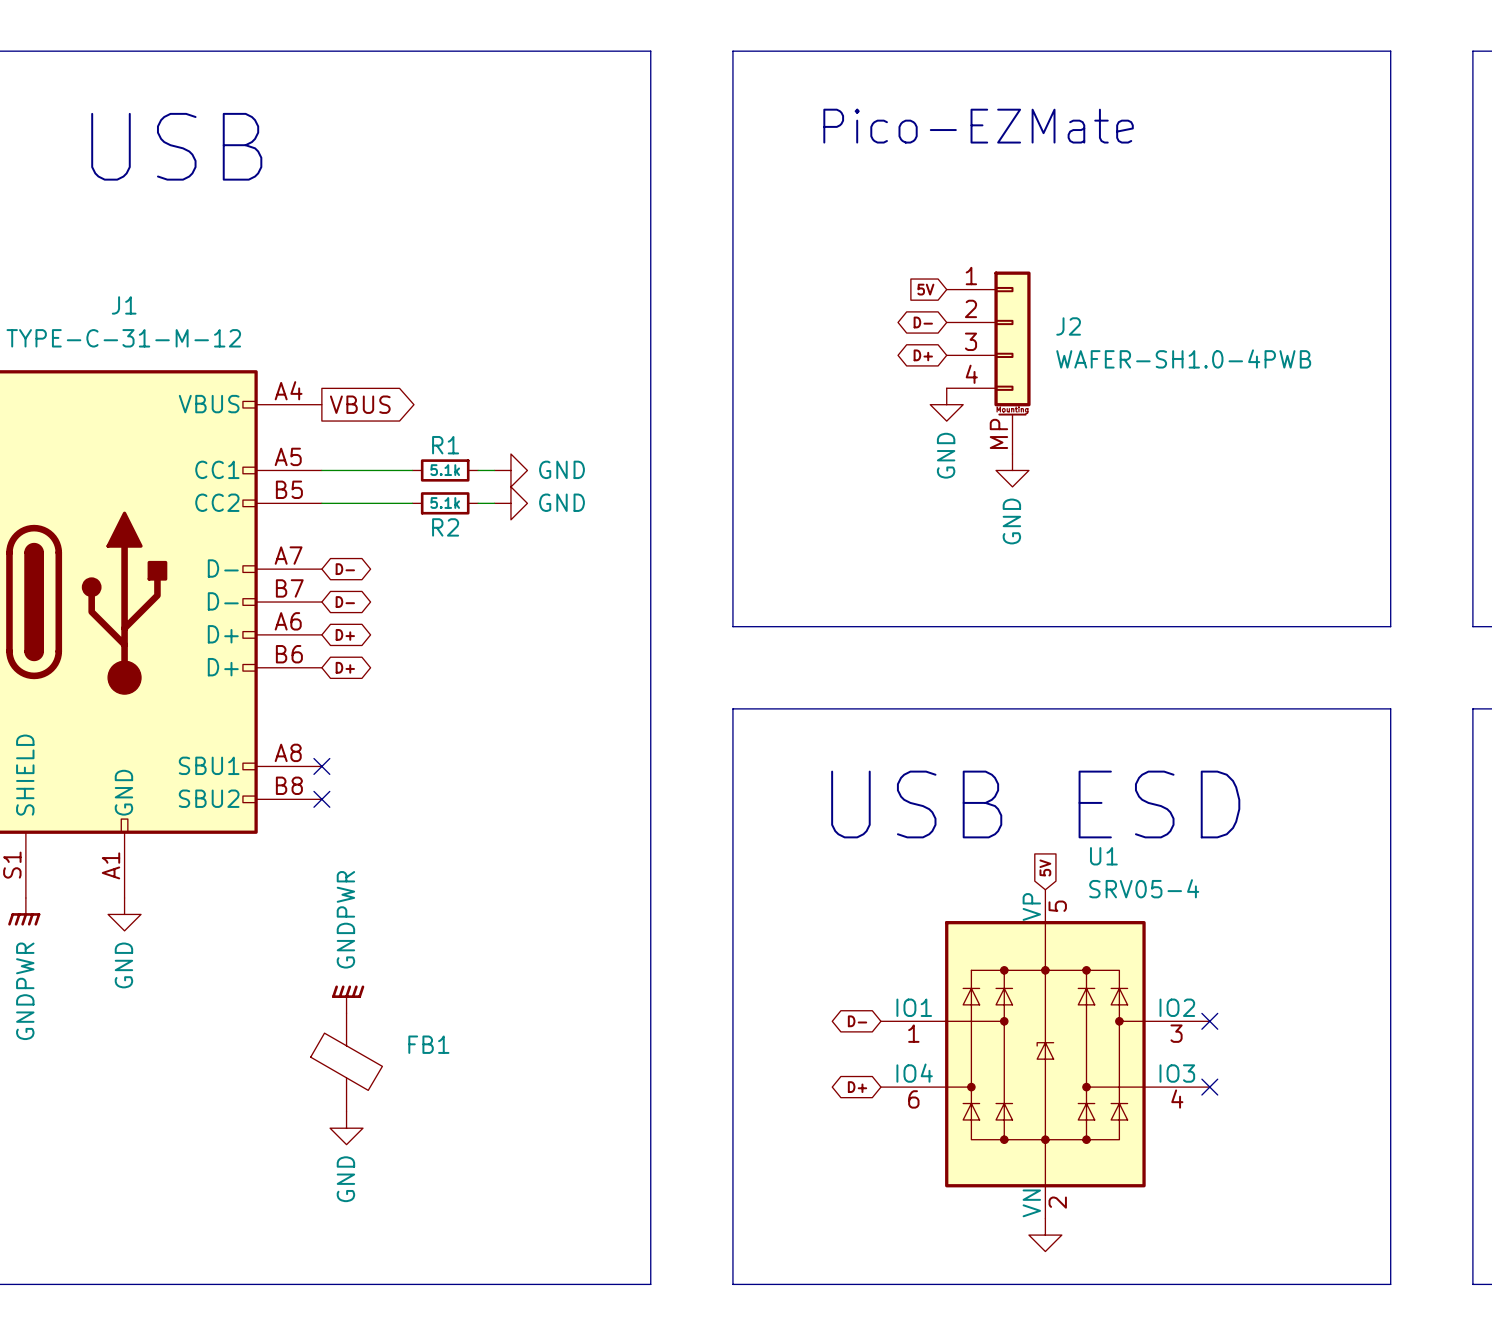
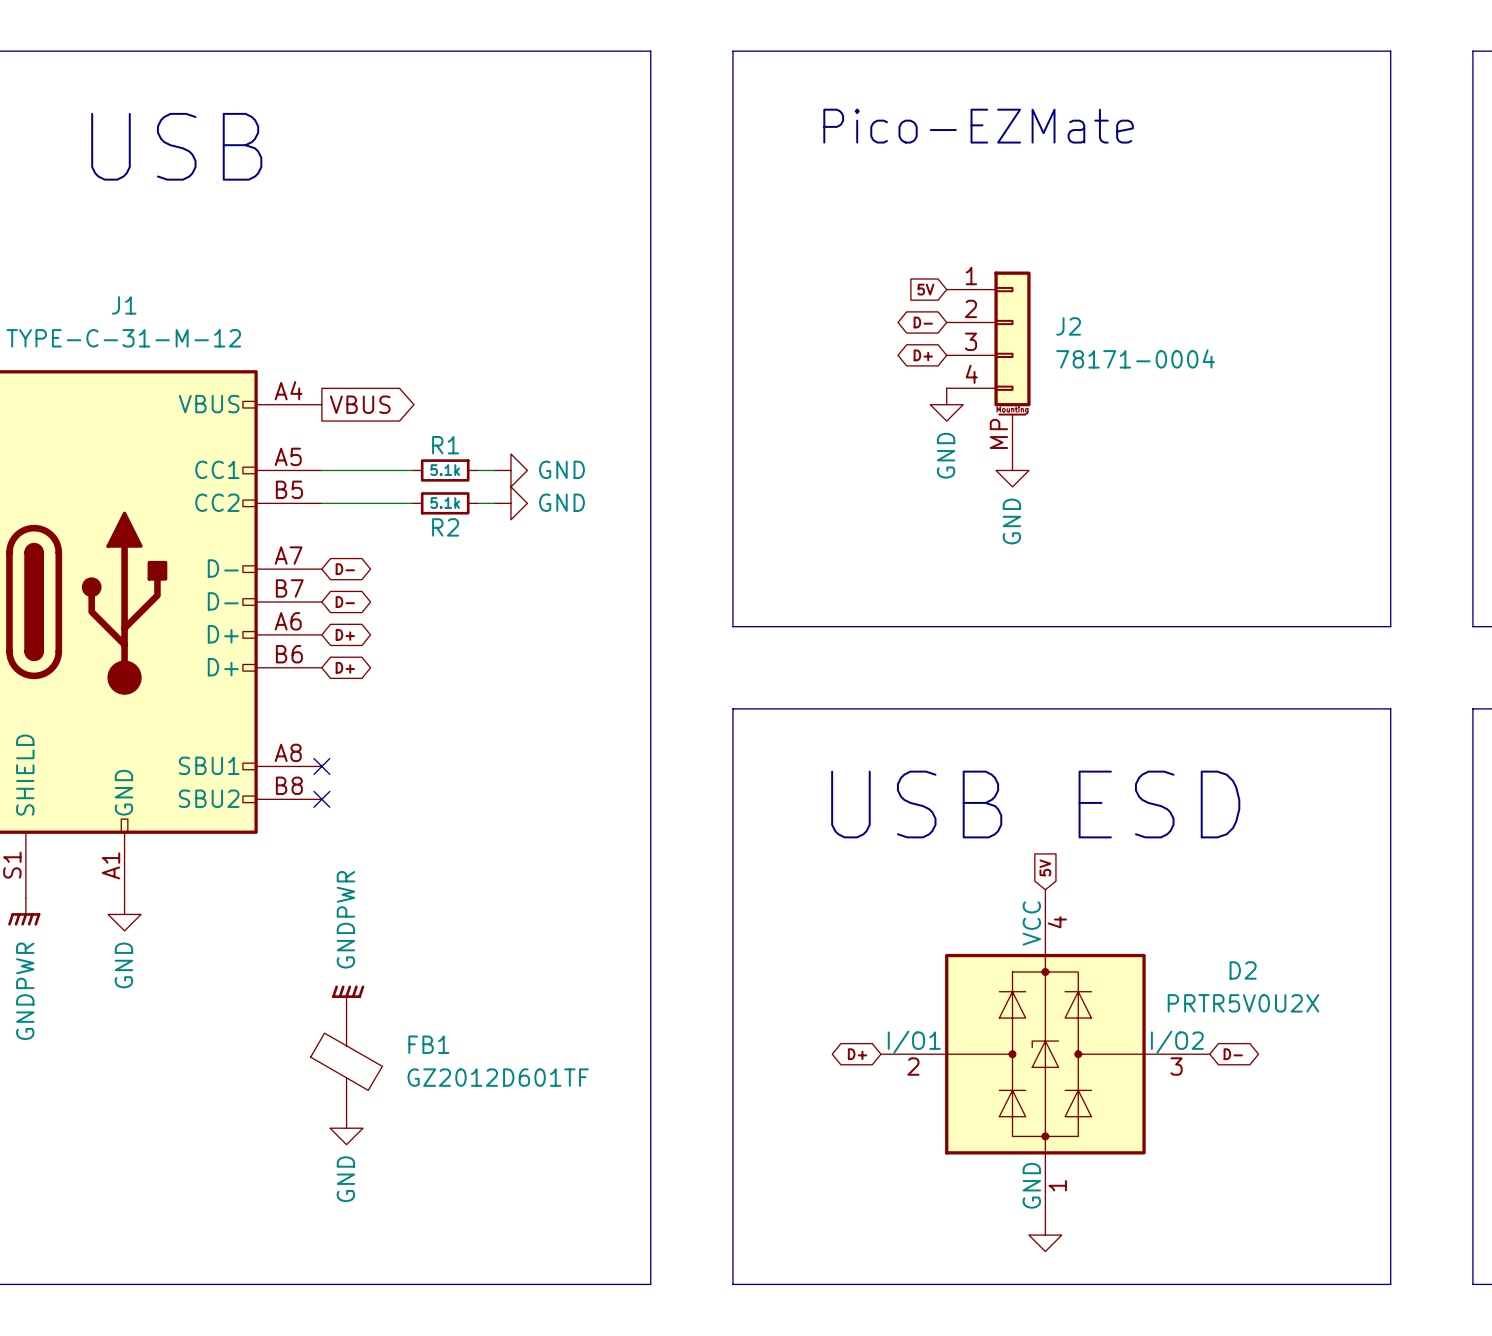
J2 value: WAFER-SH1.0-4PWB (1183, 358) -> 78171-0004 (1135, 358)
global label: D- (857, 1021) -> none
no-connect mark: (1209, 1021) -> none
U1: SRV05-4 (1045, 1054) -> none
D2: none -> PRTR5V0U2X (1045, 1054)
global label: none -> D- (1233, 1054)
FB1 value: none -> GZ2012D601TF (498, 1077)
global label position: D+ (857, 1087) -> D+ (857, 1054)
no-connect mark: (1209, 1087) -> none

